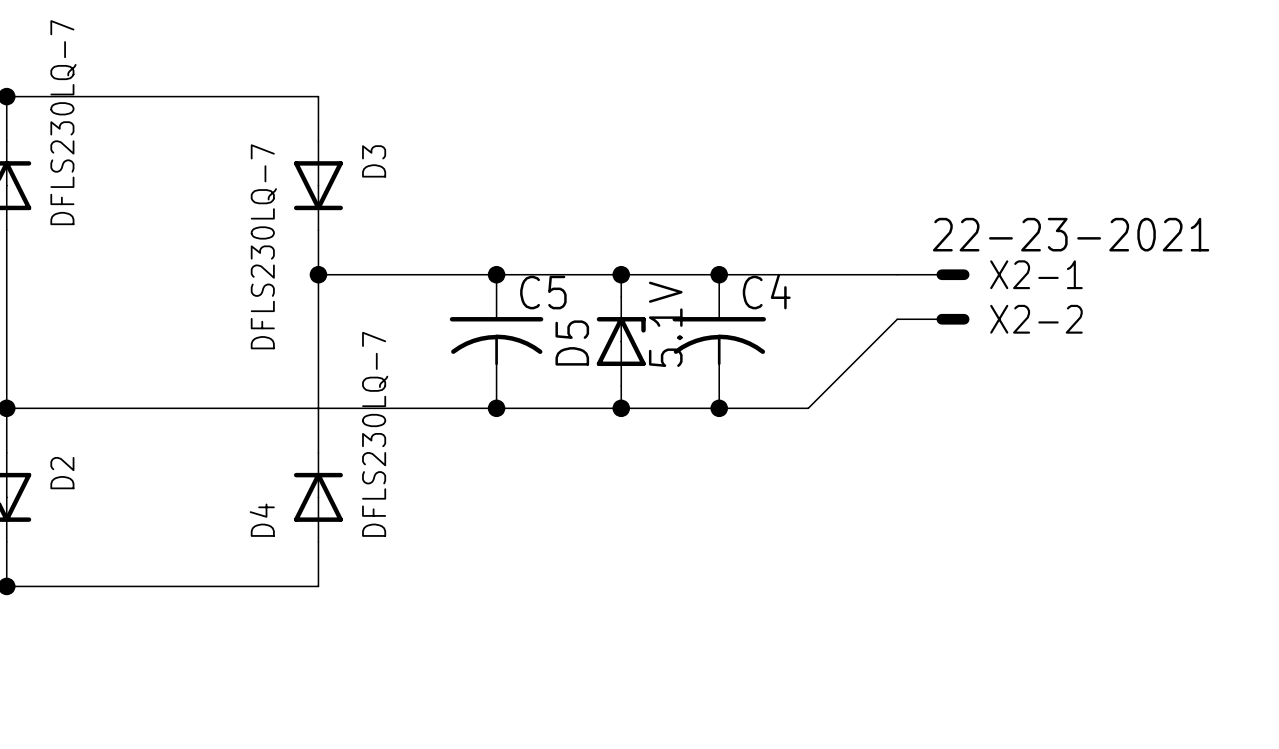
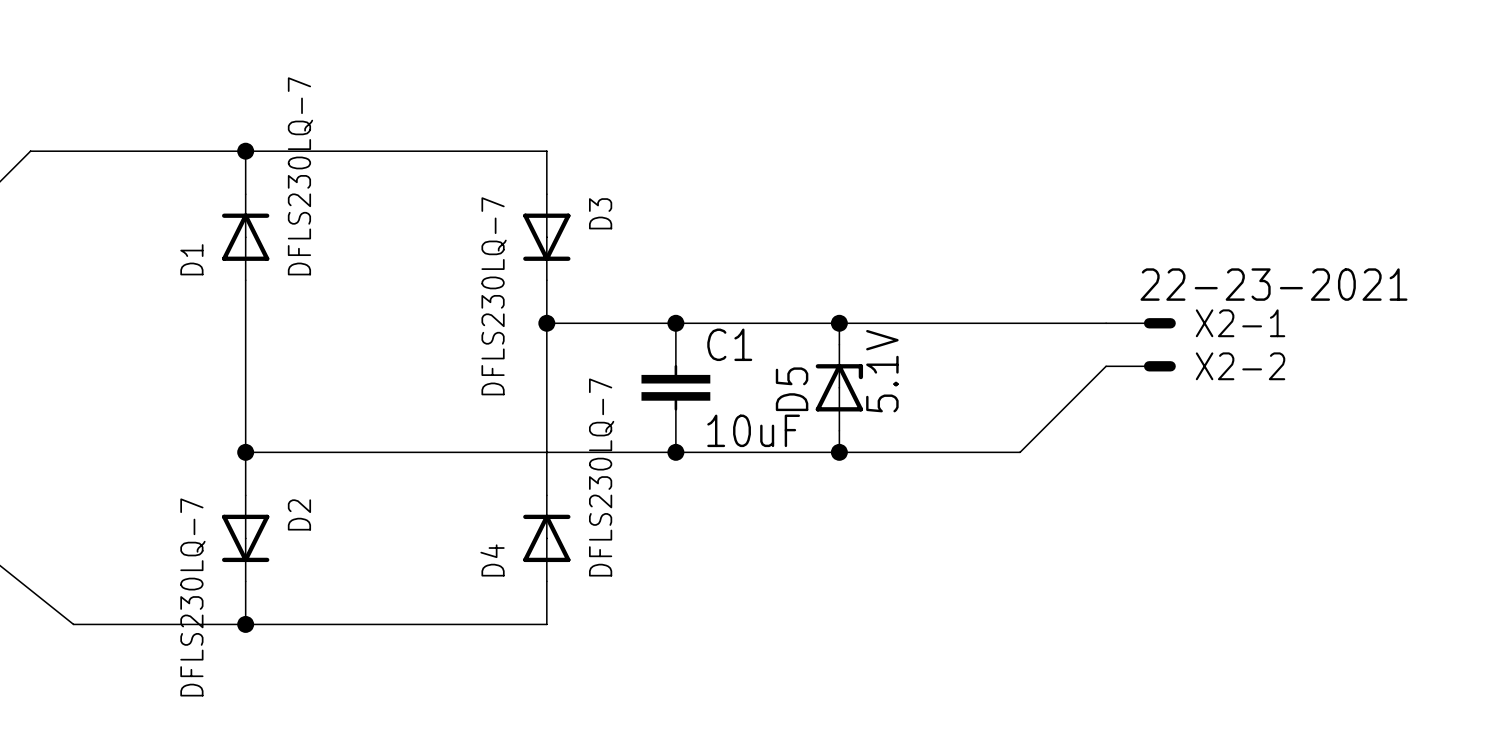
junction position: (496, 274) -> (675, 323)
junction: (719, 274) -> none
C1: none -> 10uF (675, 387)
C5: (496, 341) -> none
C4: (719, 341) -> none
junction position: (496, 408) -> (675, 452)
junction: (719, 408) -> none

